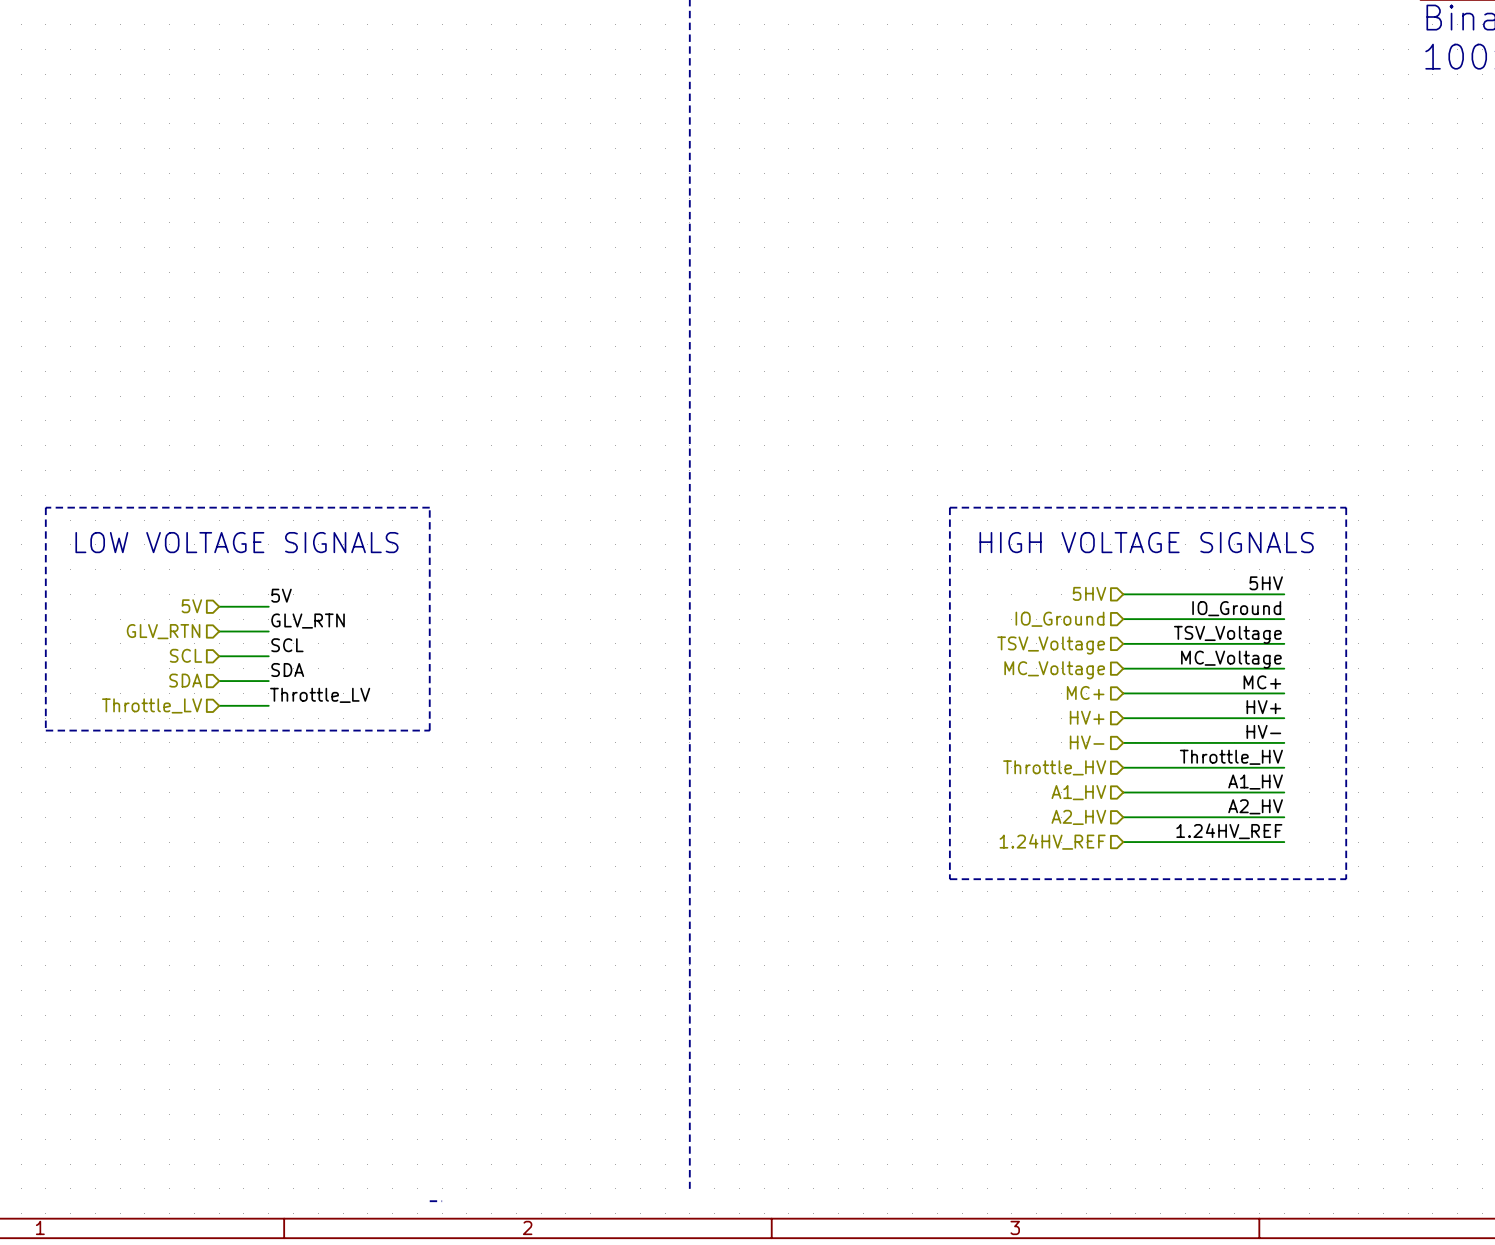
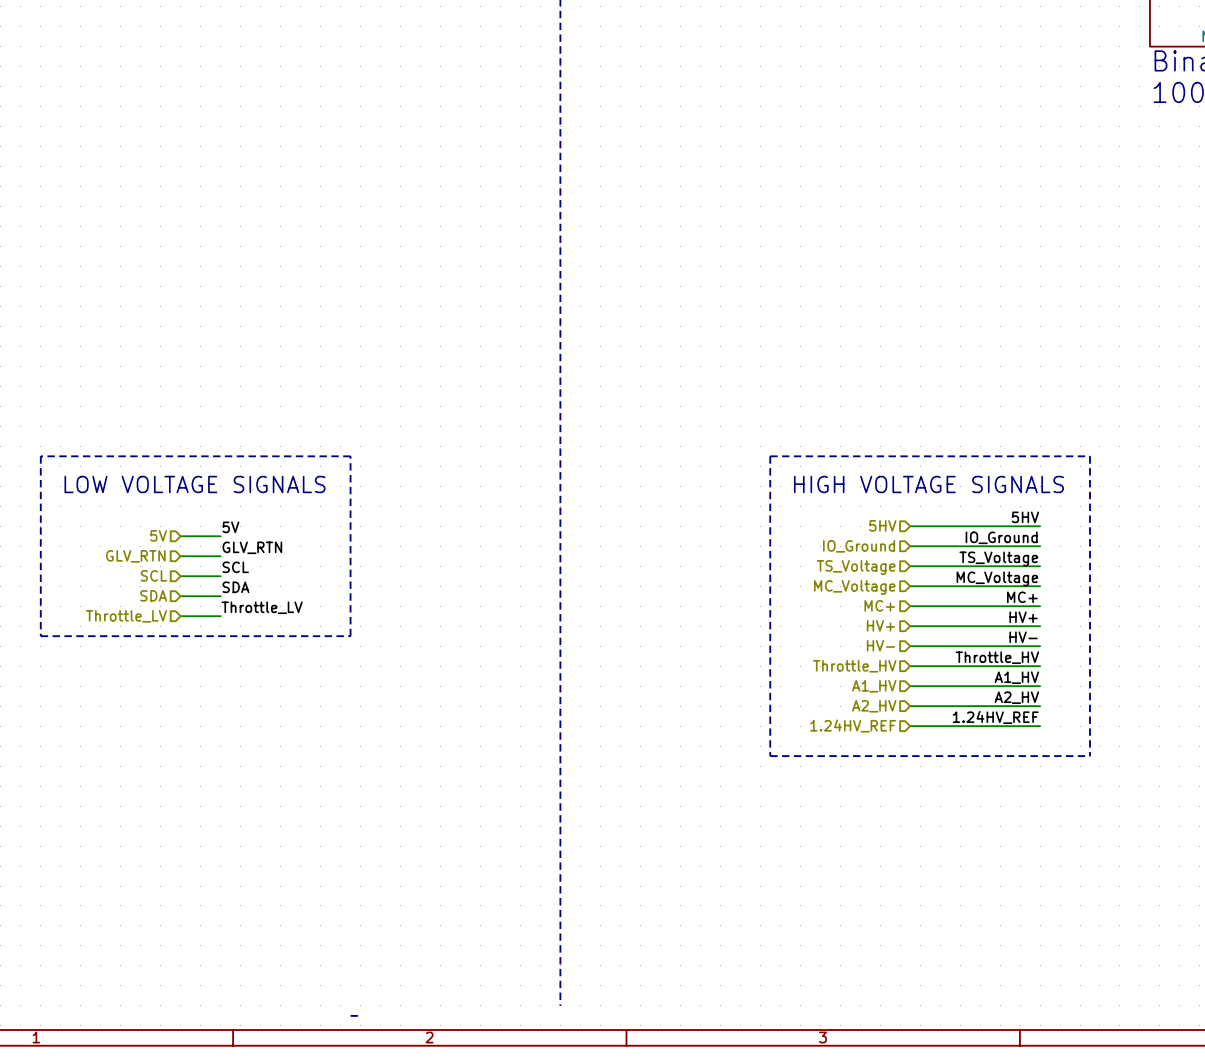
label: TSV_Voltage (1227, 634) -> TS_Voltage (998, 558)
hierarchical label: TSV_Voltage (1051, 645) -> TS_Voltage (856, 567)

